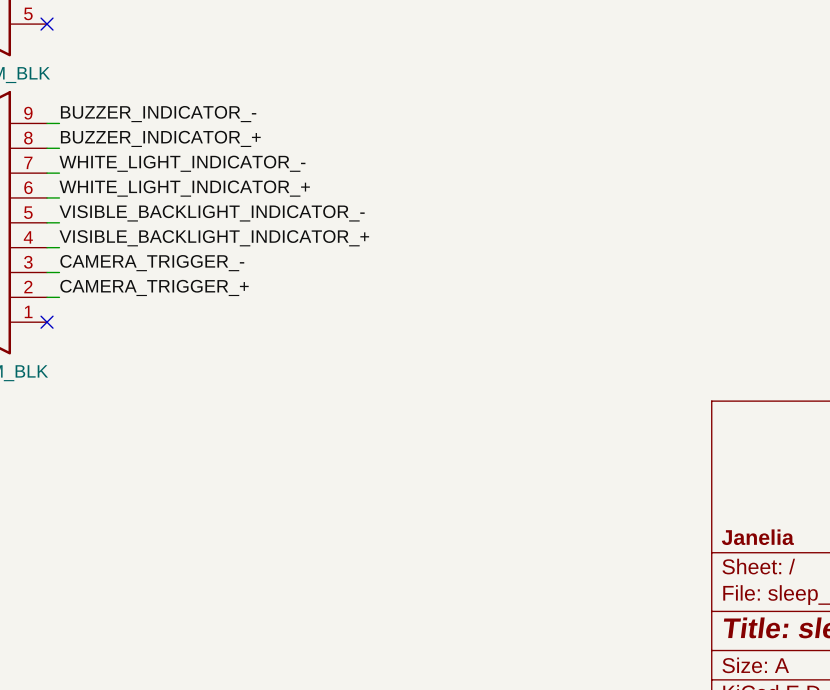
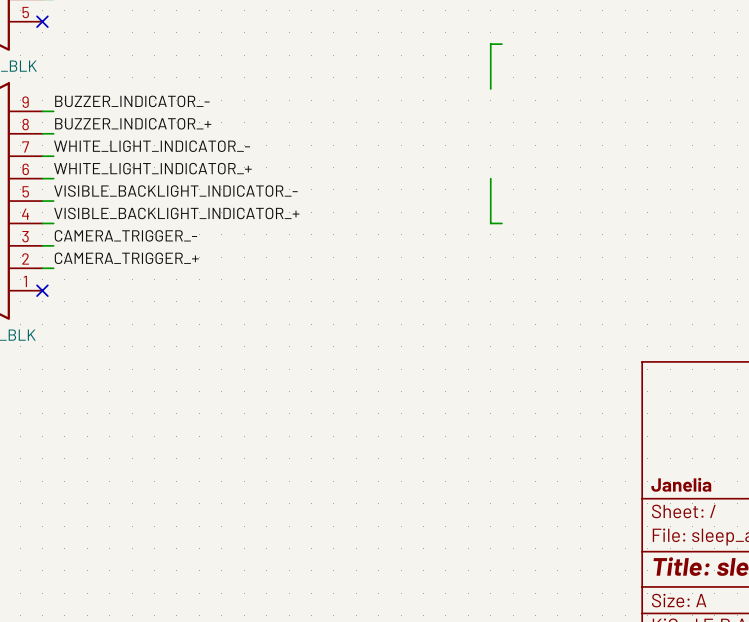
wire: none -> (501, 44) (490, 44) (490, 88)
wire: none -> (490, 178) (490, 223) (501, 223)

